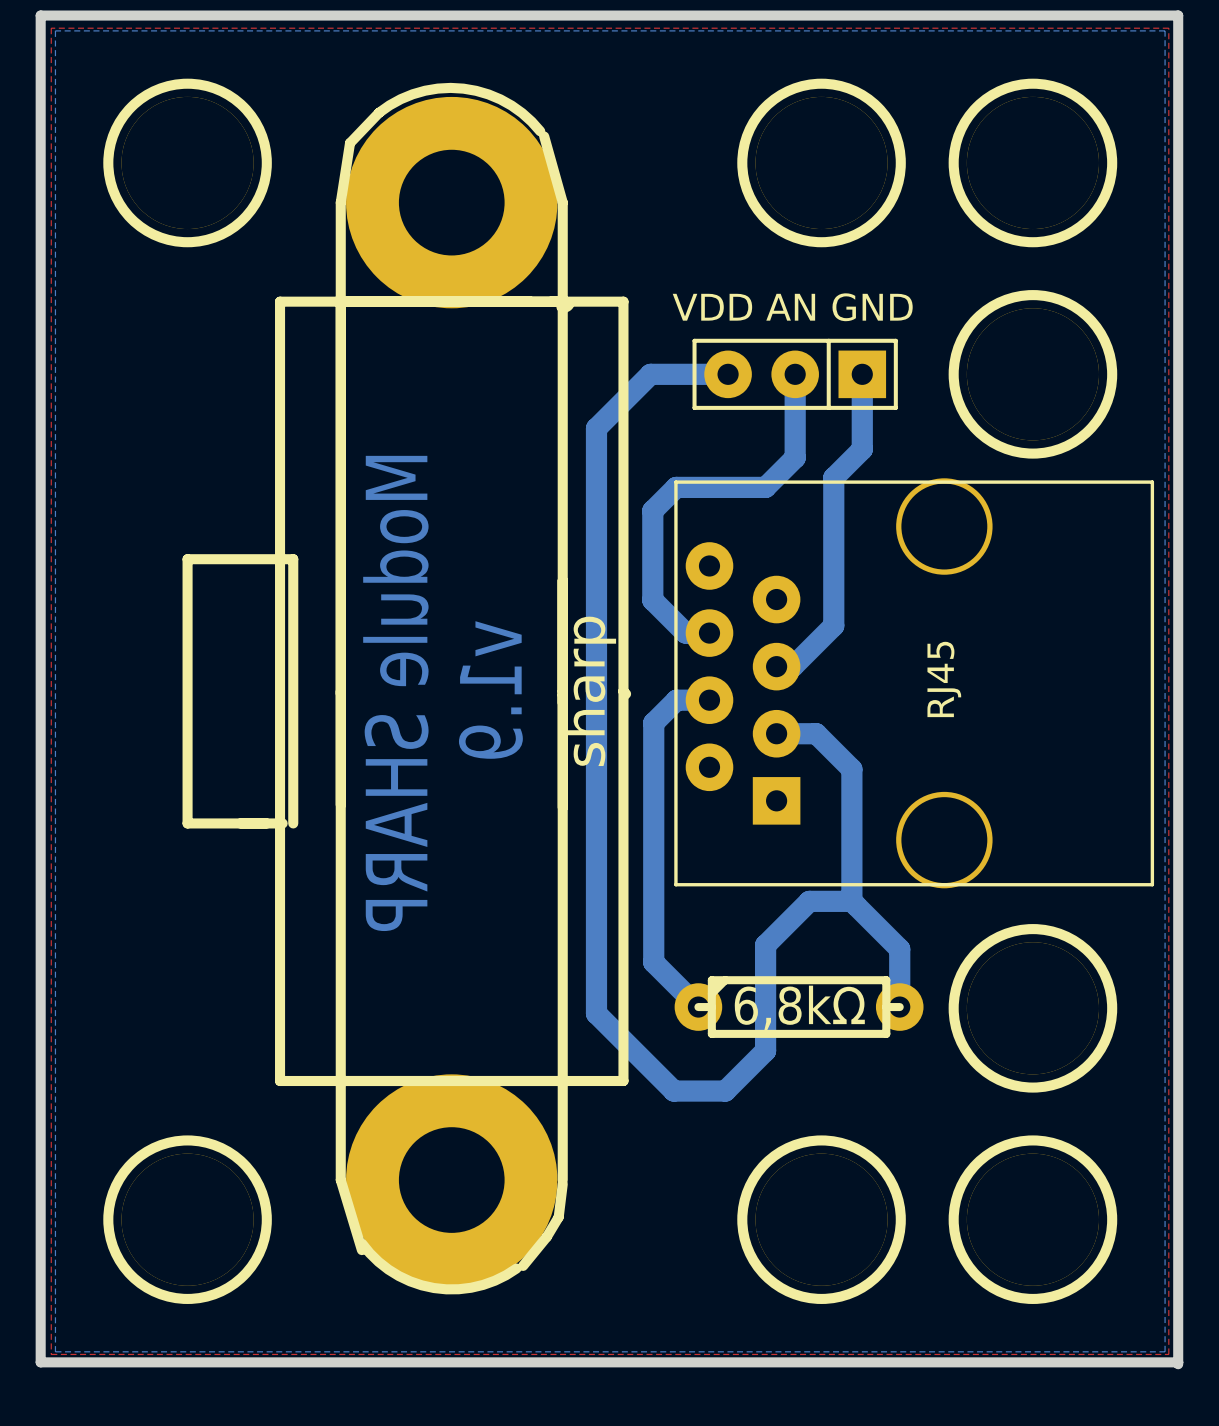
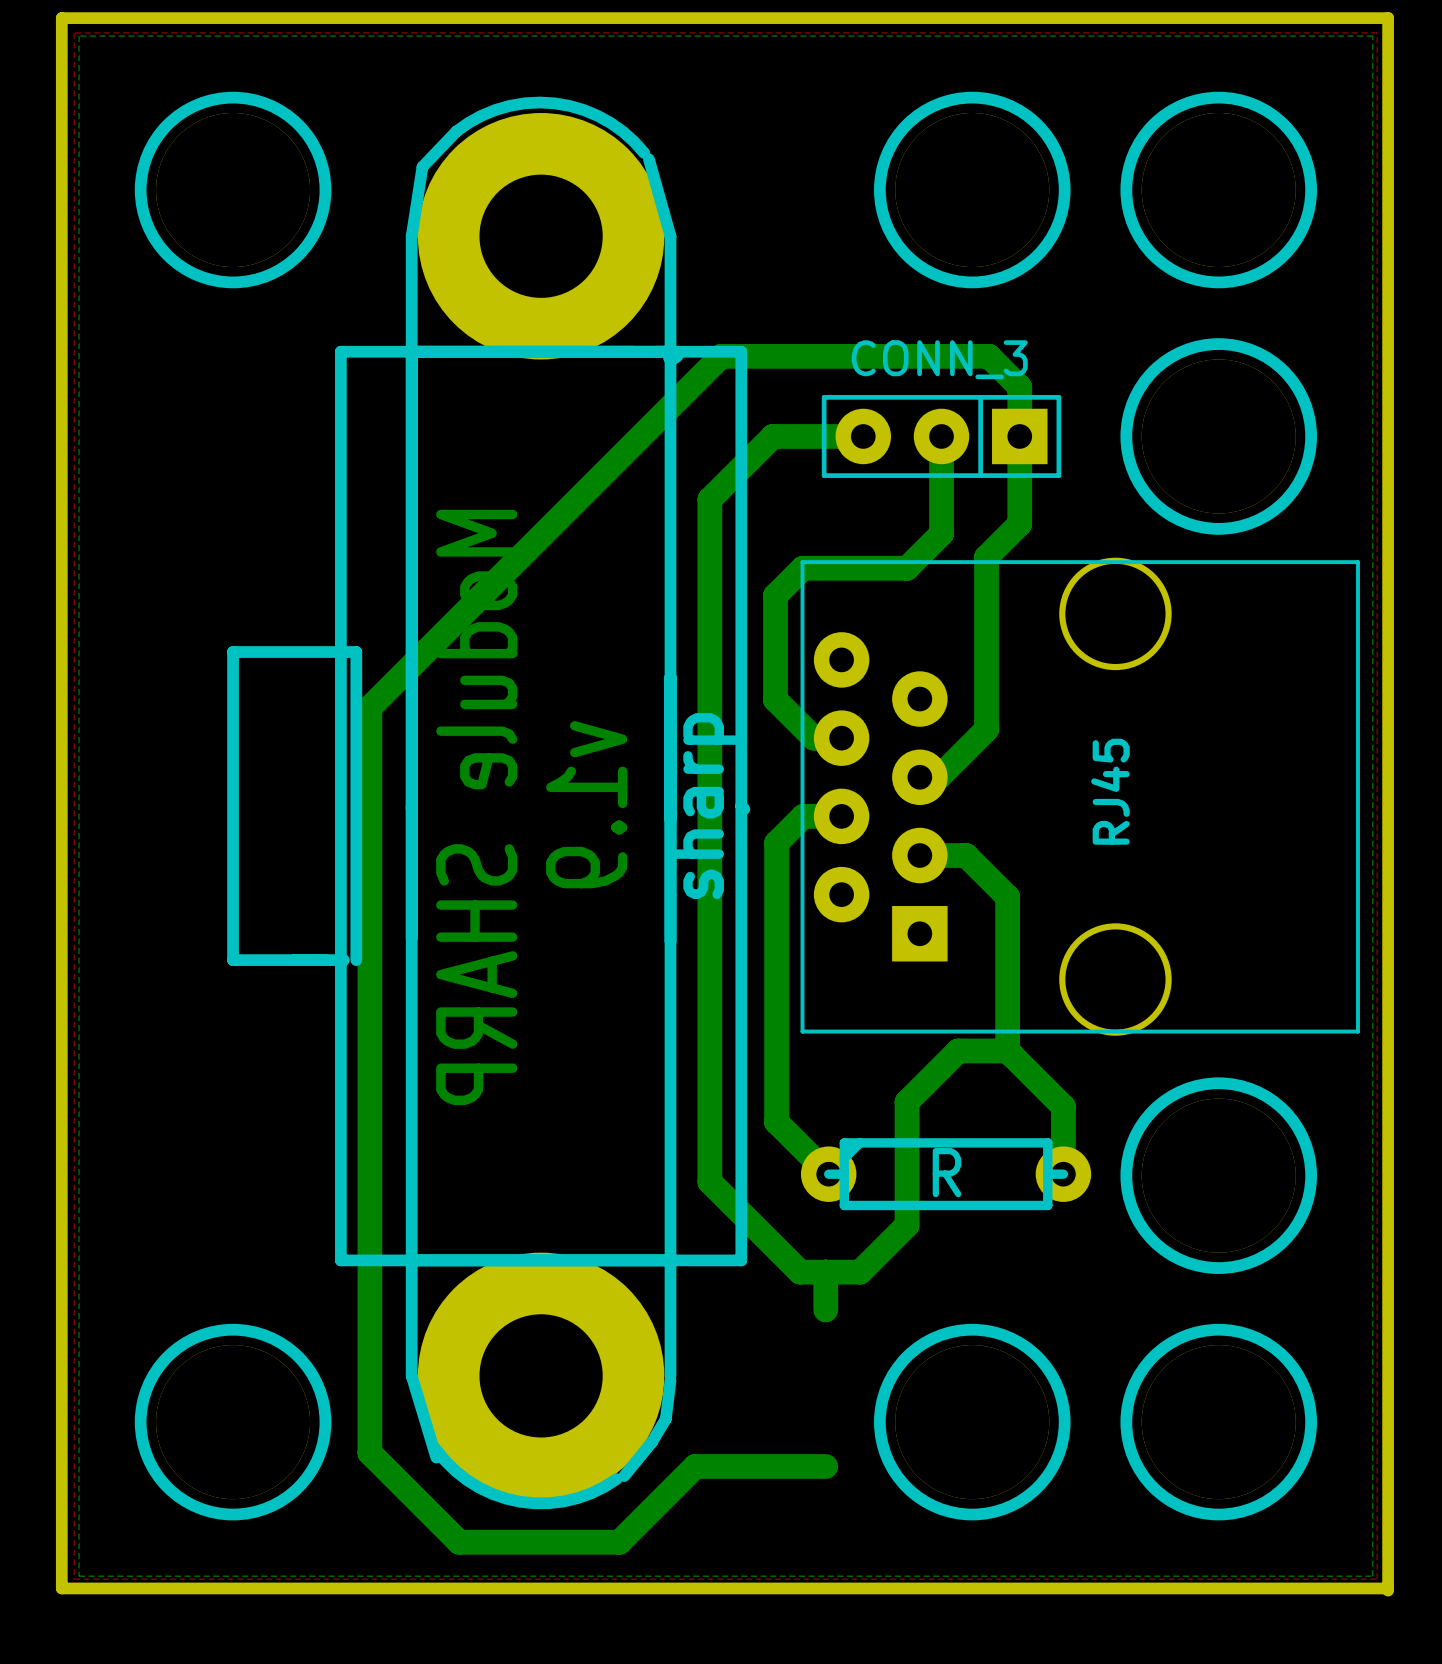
part value: VDD AN GND (792, 307) -> CONN_3 (939, 359)
bottom track: none -> (1019, 436) (1019, 387) (989, 356) (721, 356) (369, 707) (369, 1452) (459, 1542) (619, 1542) (695, 1466) (825, 1466)
part value: 6,8kΩ (799, 1007) -> R (946, 1172)
bottom track: none -> (825, 1272) (825, 1310)

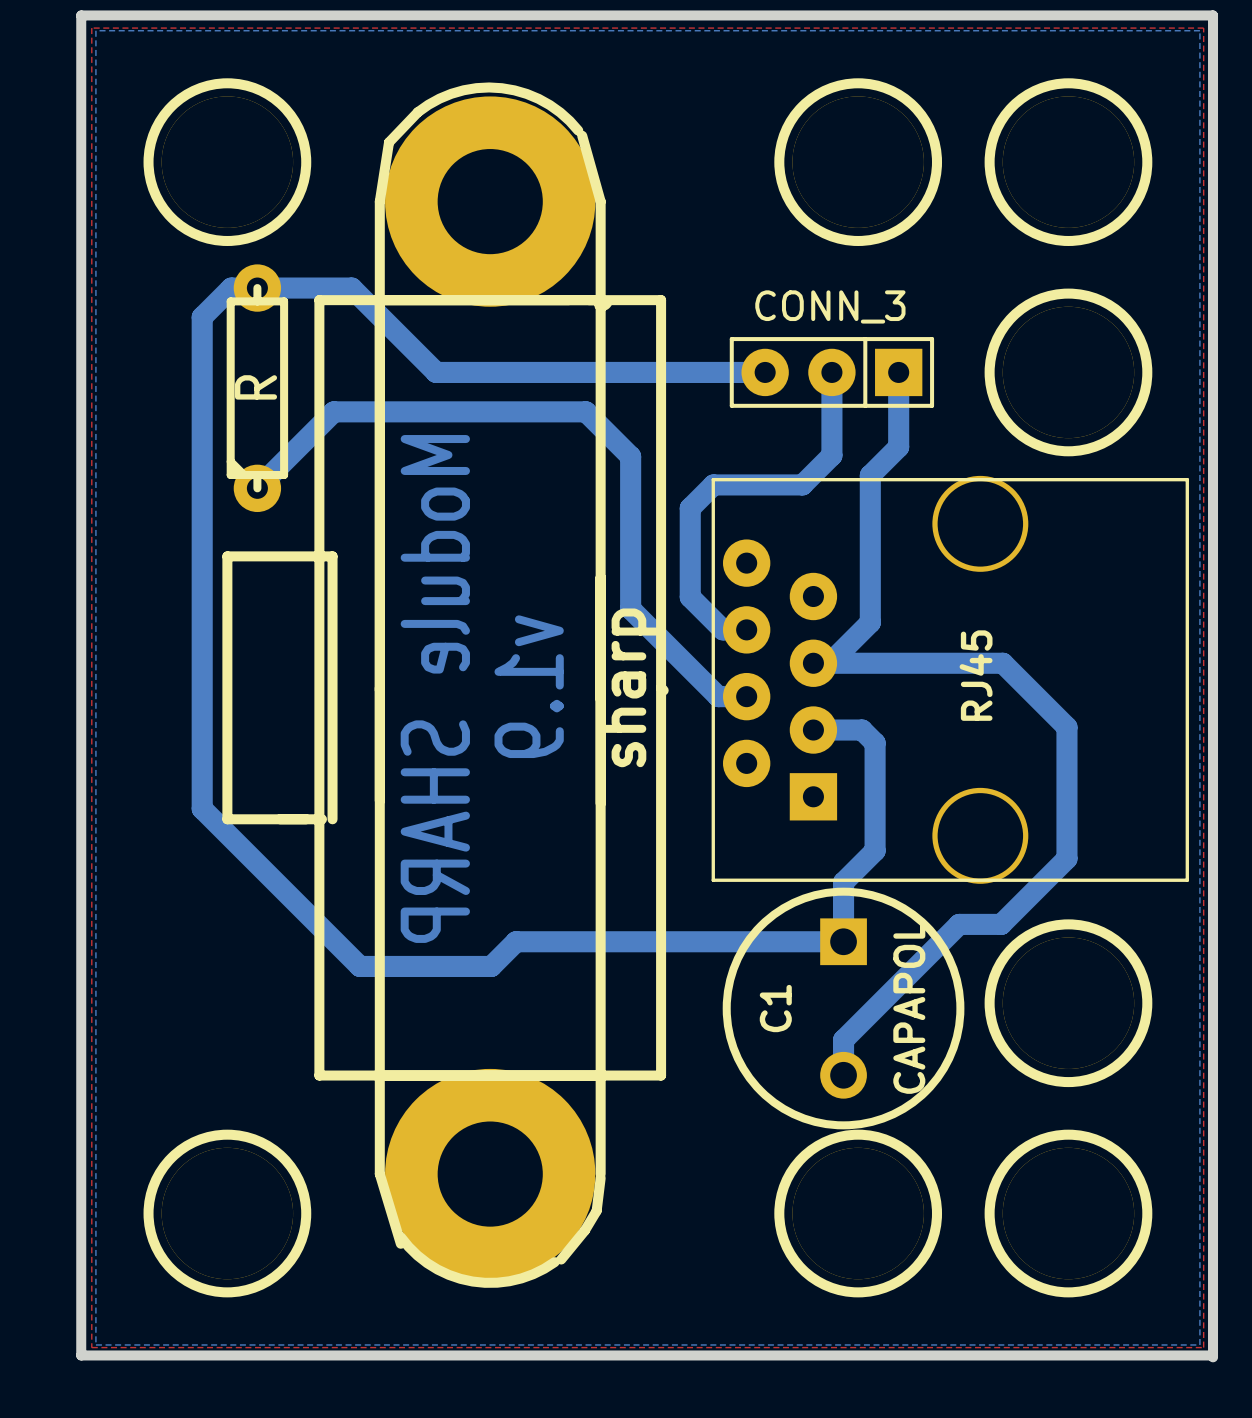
bottom track: (772, 436) (709, 499) (709, 1181) (800, 1272) (860, 1272) (907, 1225) (907, 1102) (958, 1050) (1007, 1050) -> (688, 372) (436, 372) (351, 288) (231, 288) (202, 317) (202, 808) (359, 966) (491, 966) (516, 941) (843, 941) (843, 882) (875, 850) (875, 743) (862, 730) (852, 730)
bottom track: (1019, 436) (1019, 387) (989, 356) (721, 356) (369, 707) (369, 1452) (459, 1542) (619, 1542) (695, 1466) (825, 1466) -> none
part: none -> R (257, 388)
bottom track: none -> (829, 663) (1002, 663) (1066, 727) (1066, 858) (1001, 924) (959, 924) (843, 1040) (843, 1075)
bottom track: (808, 816) (803, 816) (776, 842) (776, 1122) (828, 1174) -> (718, 696) (630, 608) (630, 456) (585, 411) (333, 411) (257, 488)
bottom track: (966, 855) (1007, 896) (1007, 1050) -> none
bottom track: (1007, 1050) (1063, 1106) (1063, 1174) -> none
part: R (946, 1174) -> none
C1: none -> CAPAPOL (843, 1008)
bottom track: (825, 1272) (825, 1310) -> none

